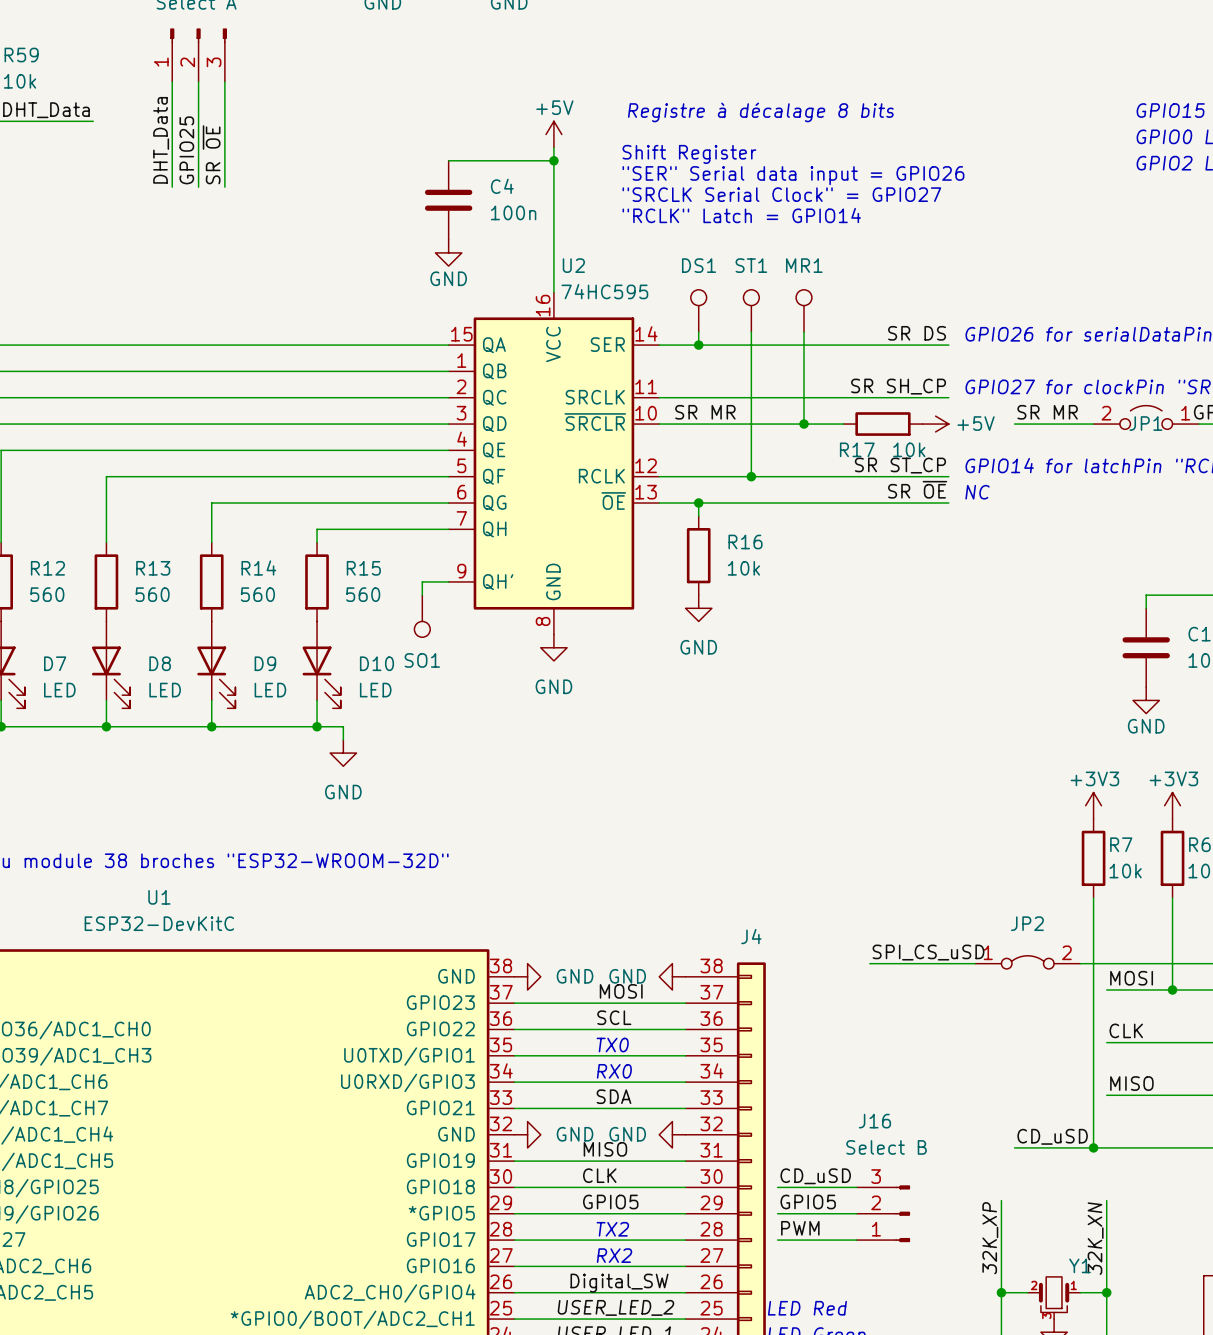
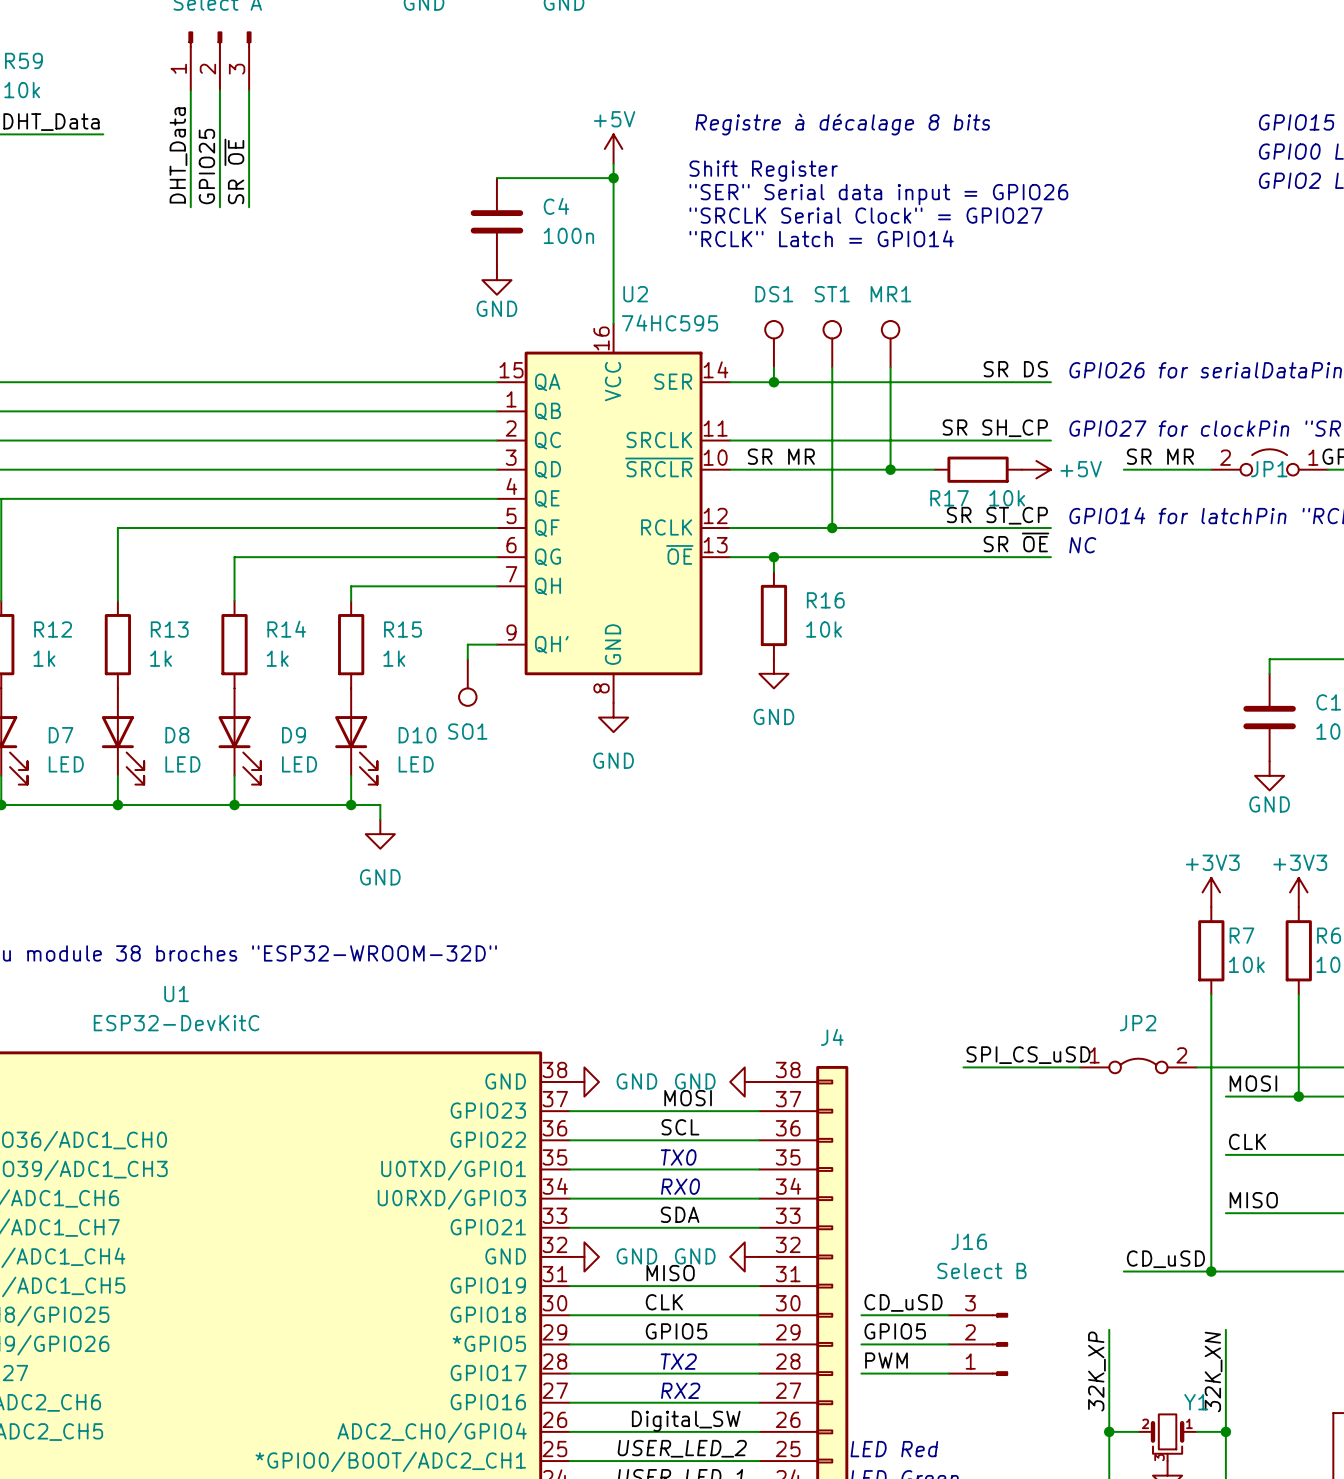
R12 value: 560 (47, 594) -> 1k (44, 658)
R13 value: 560 (152, 594) -> 1k (161, 658)
R14 value: 560 (257, 594) -> 1k (277, 658)
R15 value: 560 (363, 594) -> 1k (394, 658)

